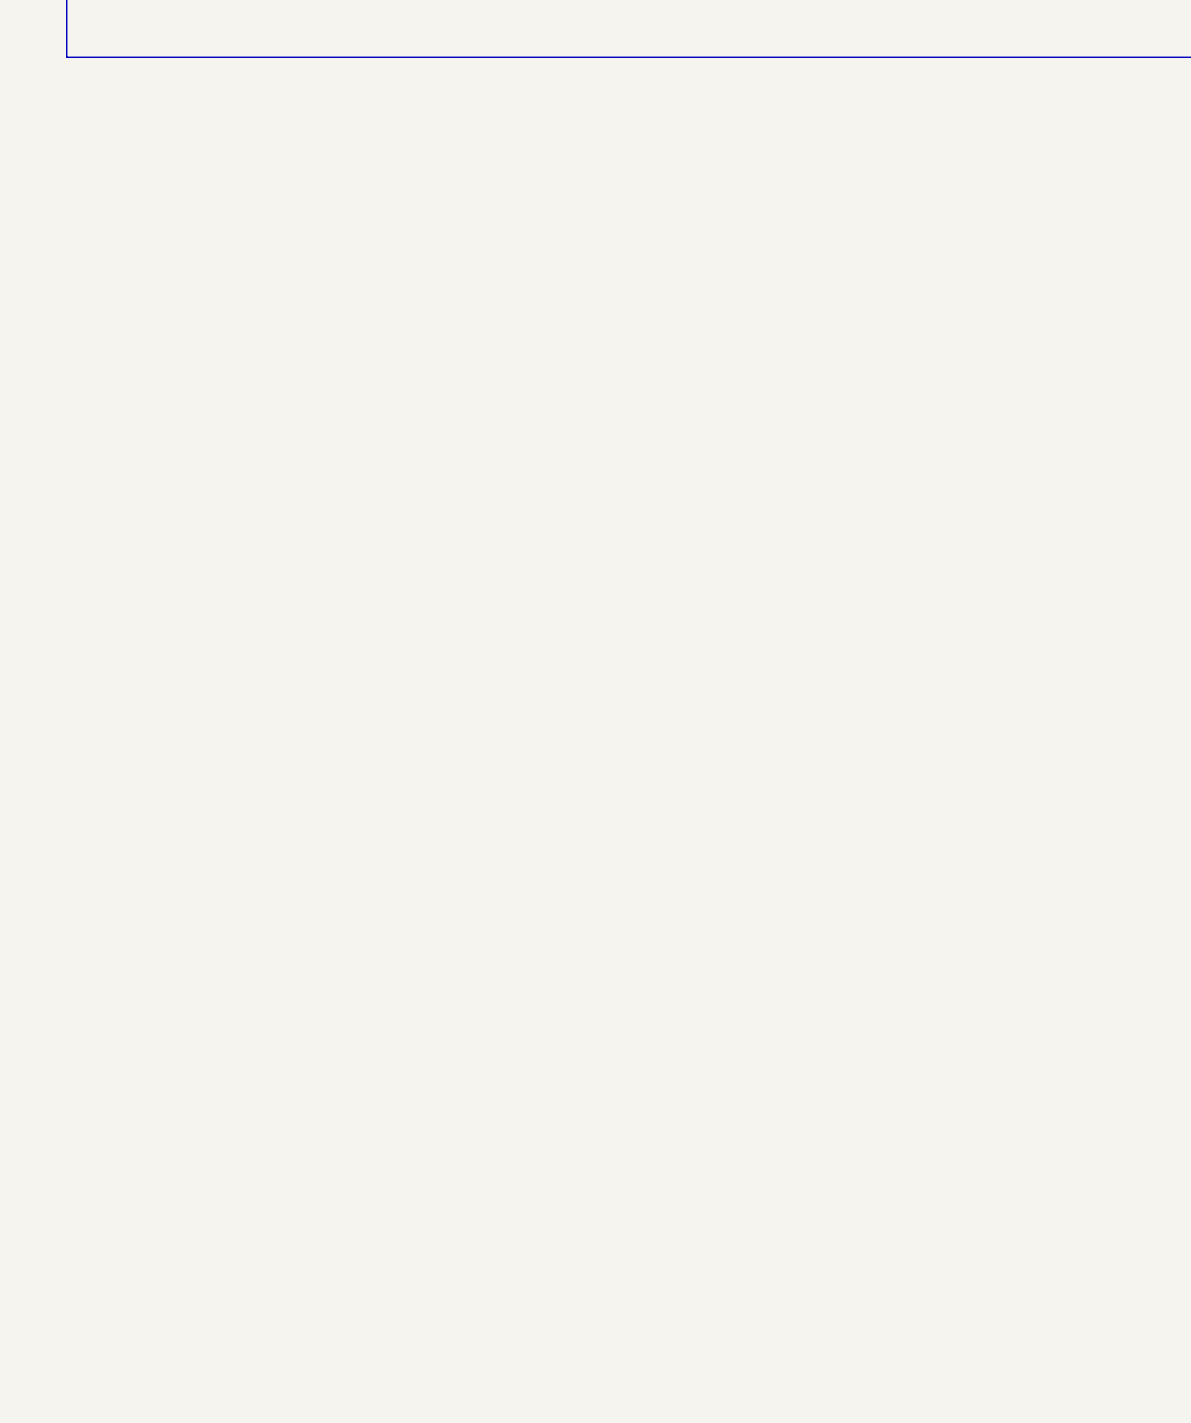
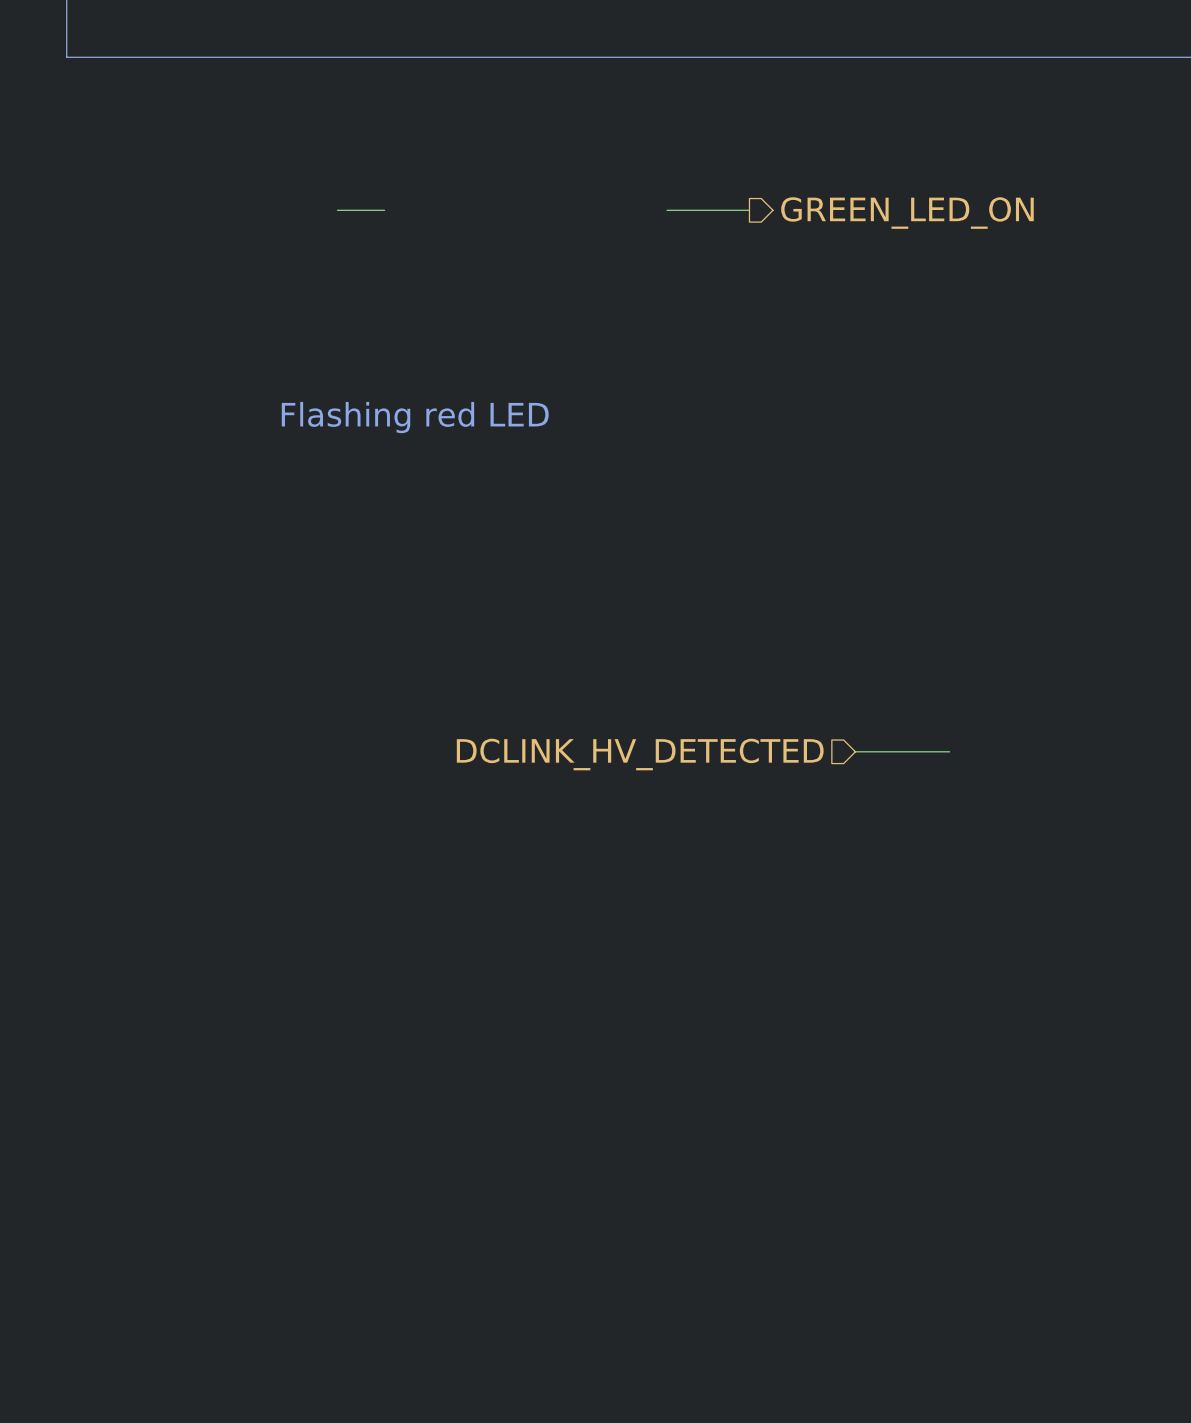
wire: none -> (337, 210) (384, 210)
wire: none -> (667, 210) (749, 210)
hierarchical label: none -> GREEN_LED_ON (907, 213)
text: none -> Flashing red LED (415, 417)
wire: none -> (855, 751) (949, 751)
hierarchical label: none -> DCLINK_HV_DETECTED (640, 754)

